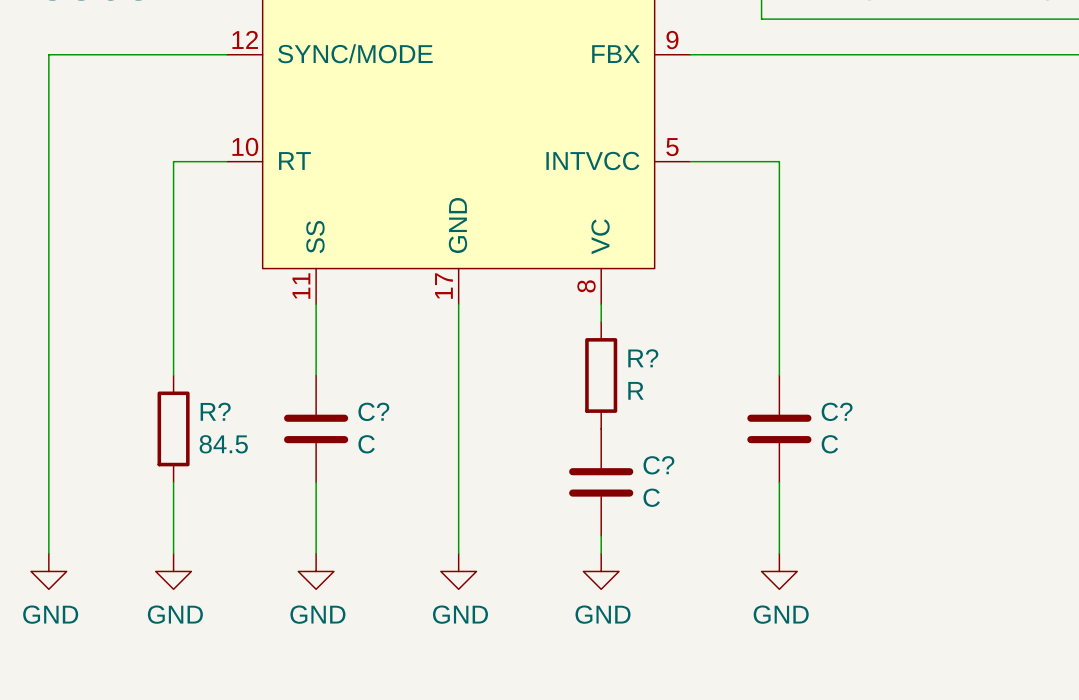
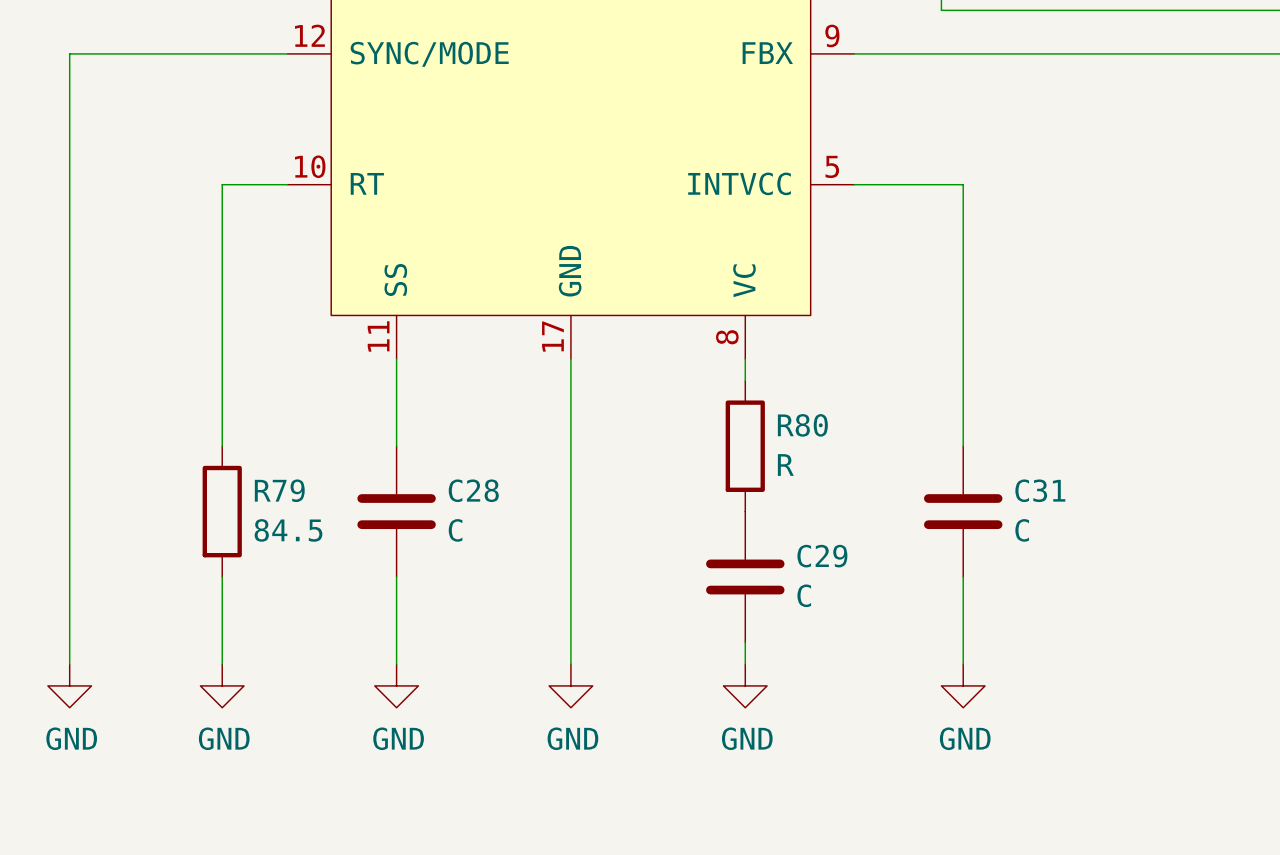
R? name: R? (643, 358) -> R80 (802, 425)
R? name: R? (215, 411) -> R79 (279, 490)
C? name: C? (373, 411) -> C28 (473, 490)
C? name: C? (837, 411) -> C31 (1040, 490)
C? name: C? (658, 465) -> C29 (822, 556)

